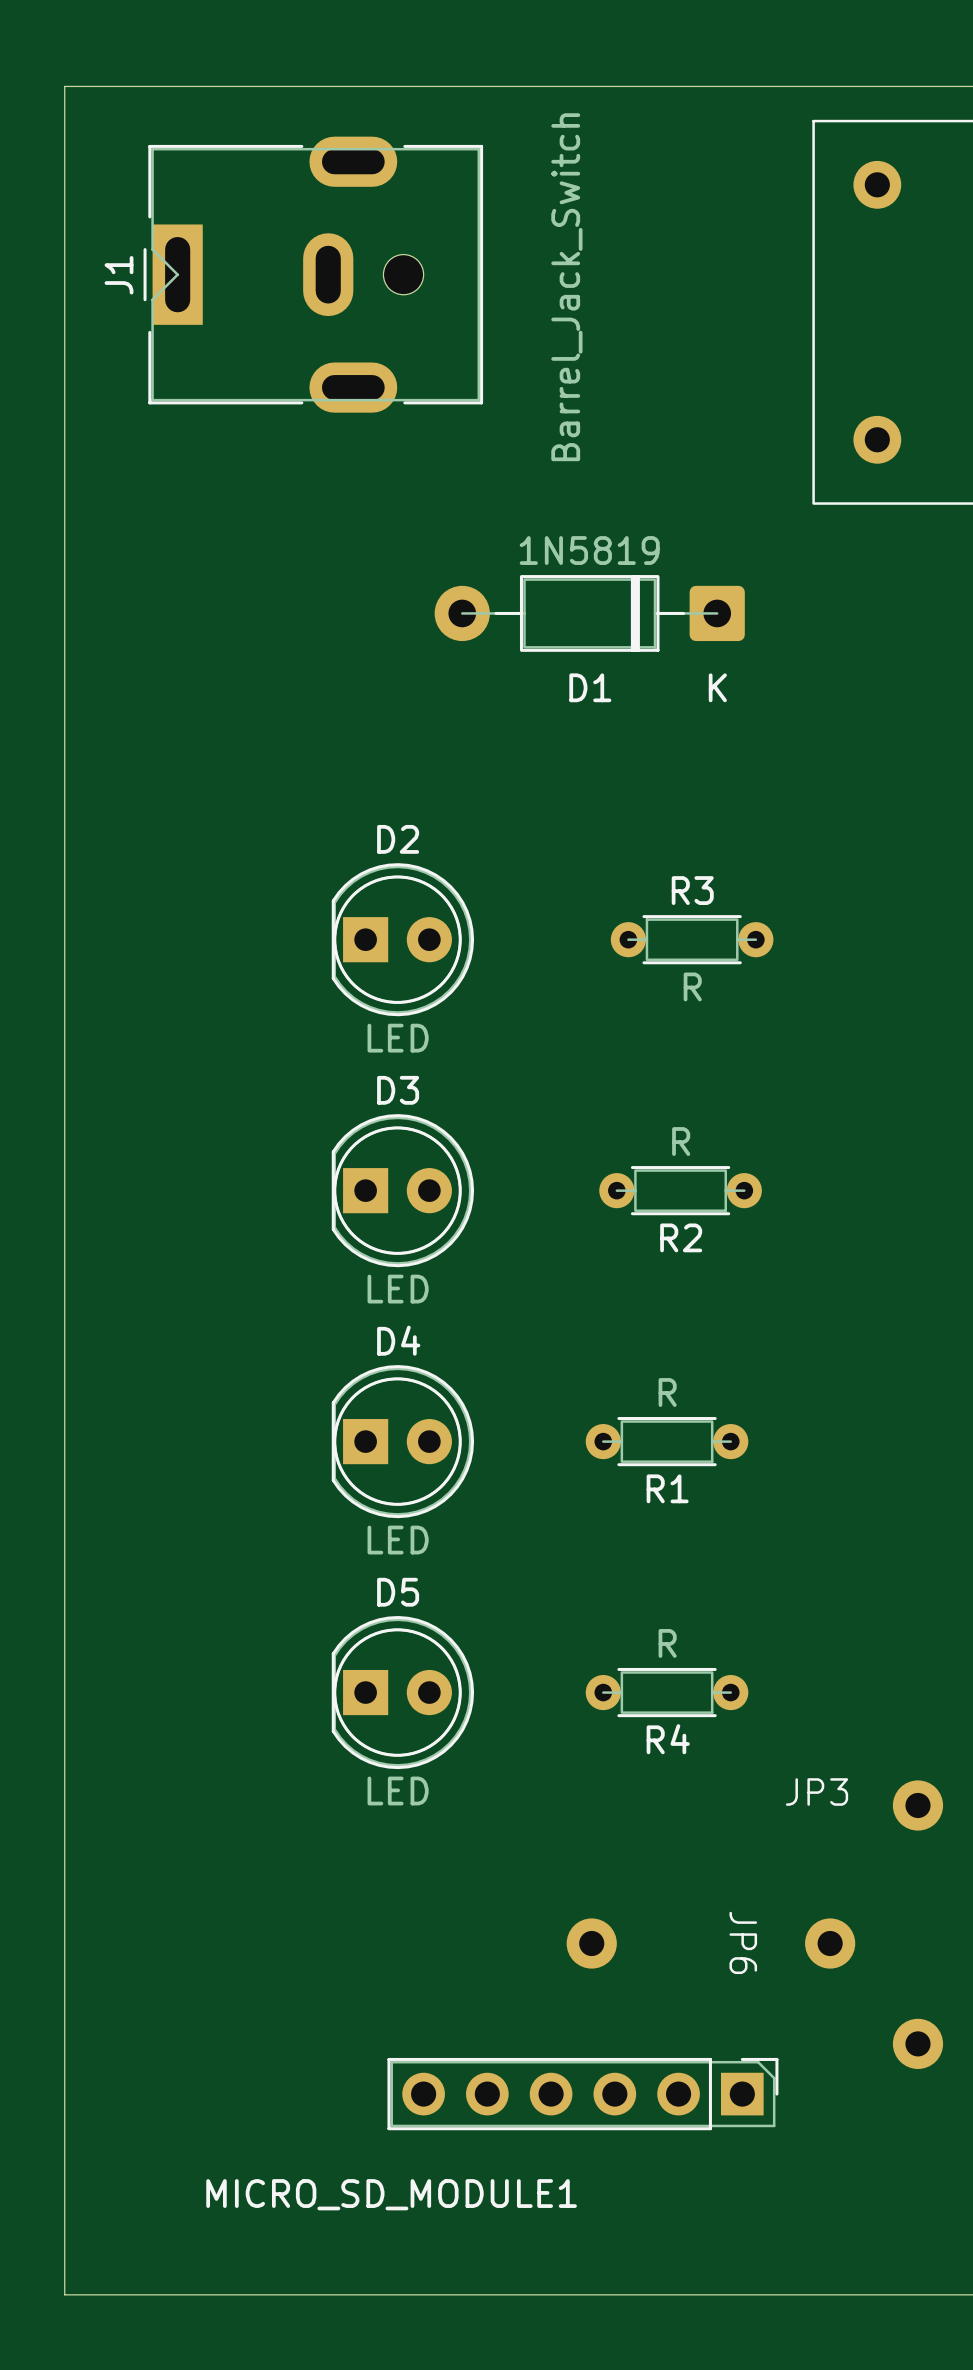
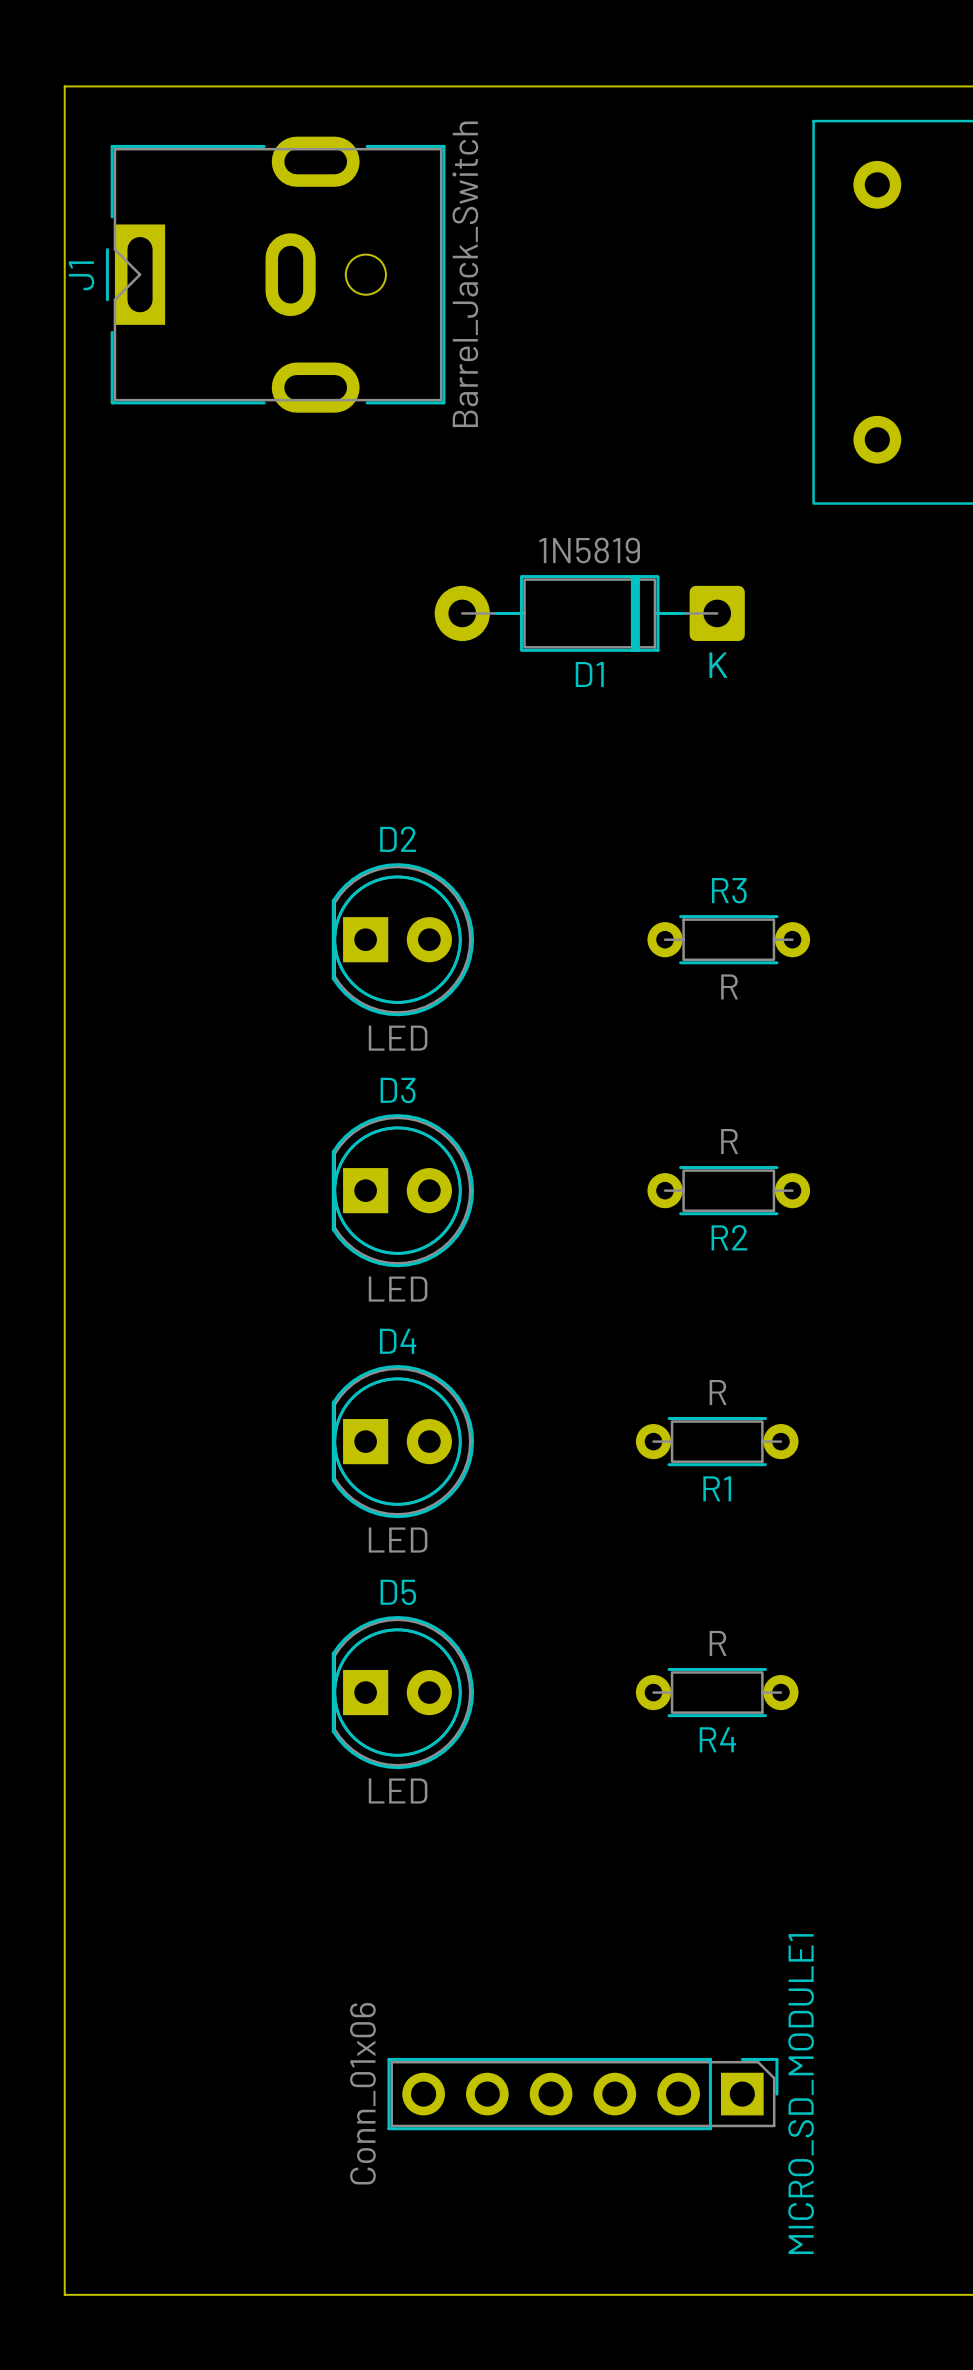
J1 position: (313, 274) -> (275, 274)
J1 value position: Barrel_Jack_Switch (566, 287) -> Barrel_Jack_Switch (465, 274)
D1 footprint: [434, 575, 745, 652] -> [434, 575, 745, 652]
R3 position: (692, 939) -> (728, 939)
R2 position: (680, 1190) -> (728, 1190)
R1 position: (667, 1441) -> (717, 1441)
R4 position: (667, 1692) -> (717, 1692)
JP3: (917, 1924) -> none
JP6: (710, 1943) -> none
MICRO_SD_MODULE1 value: none -> Conn_01x06 (362, 2093)
MICRO_SD_MODULE1 name rotation: 0° (391, 2194) -> 90° counterclockwise (801, 2094)

